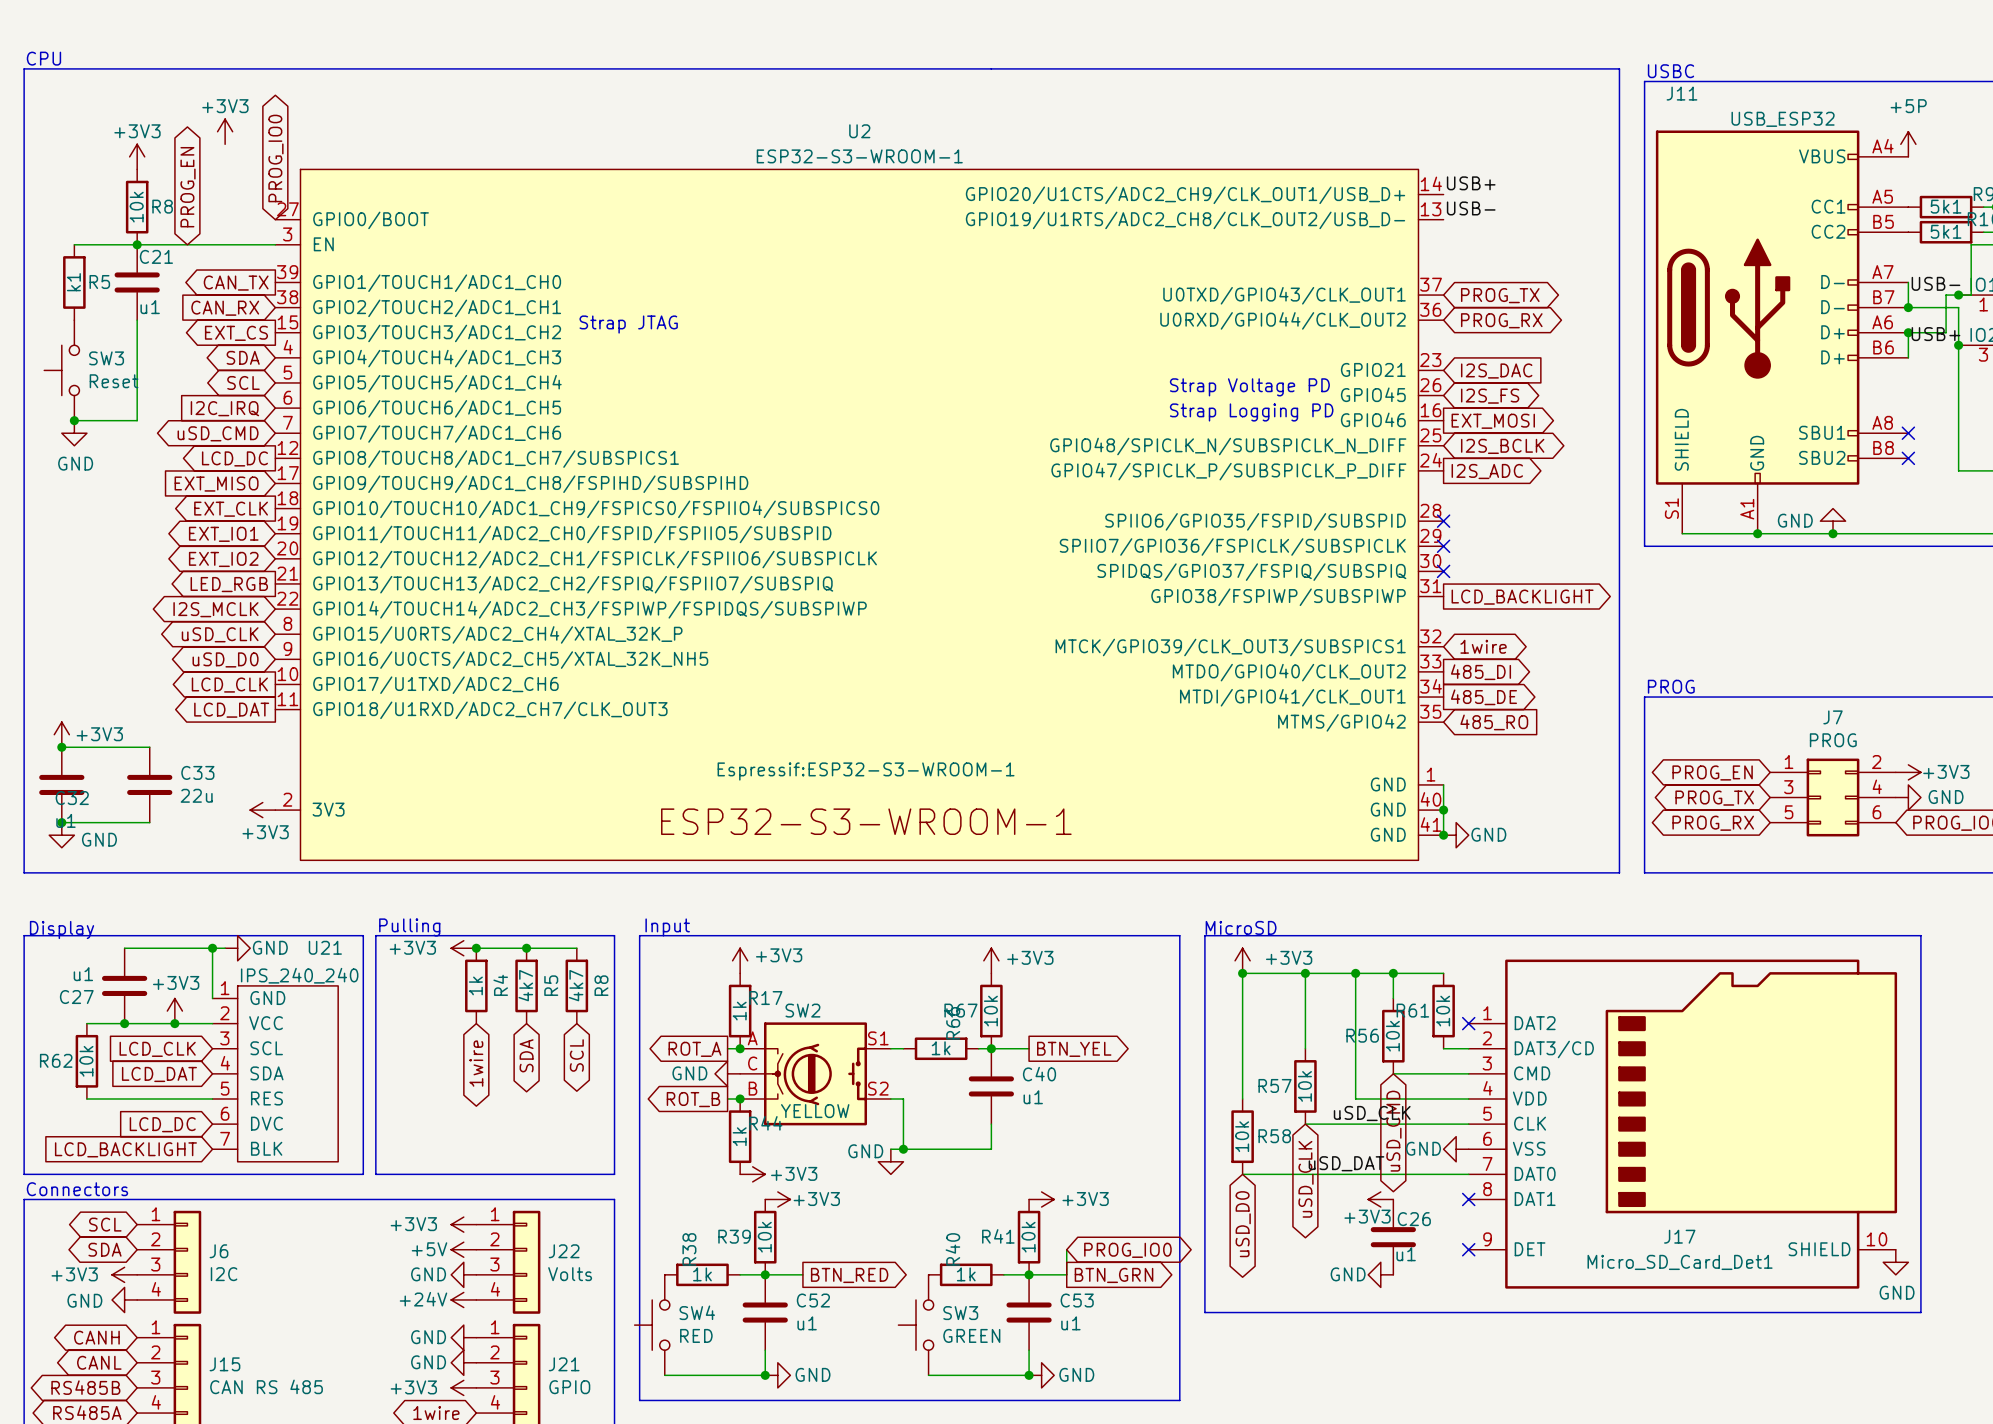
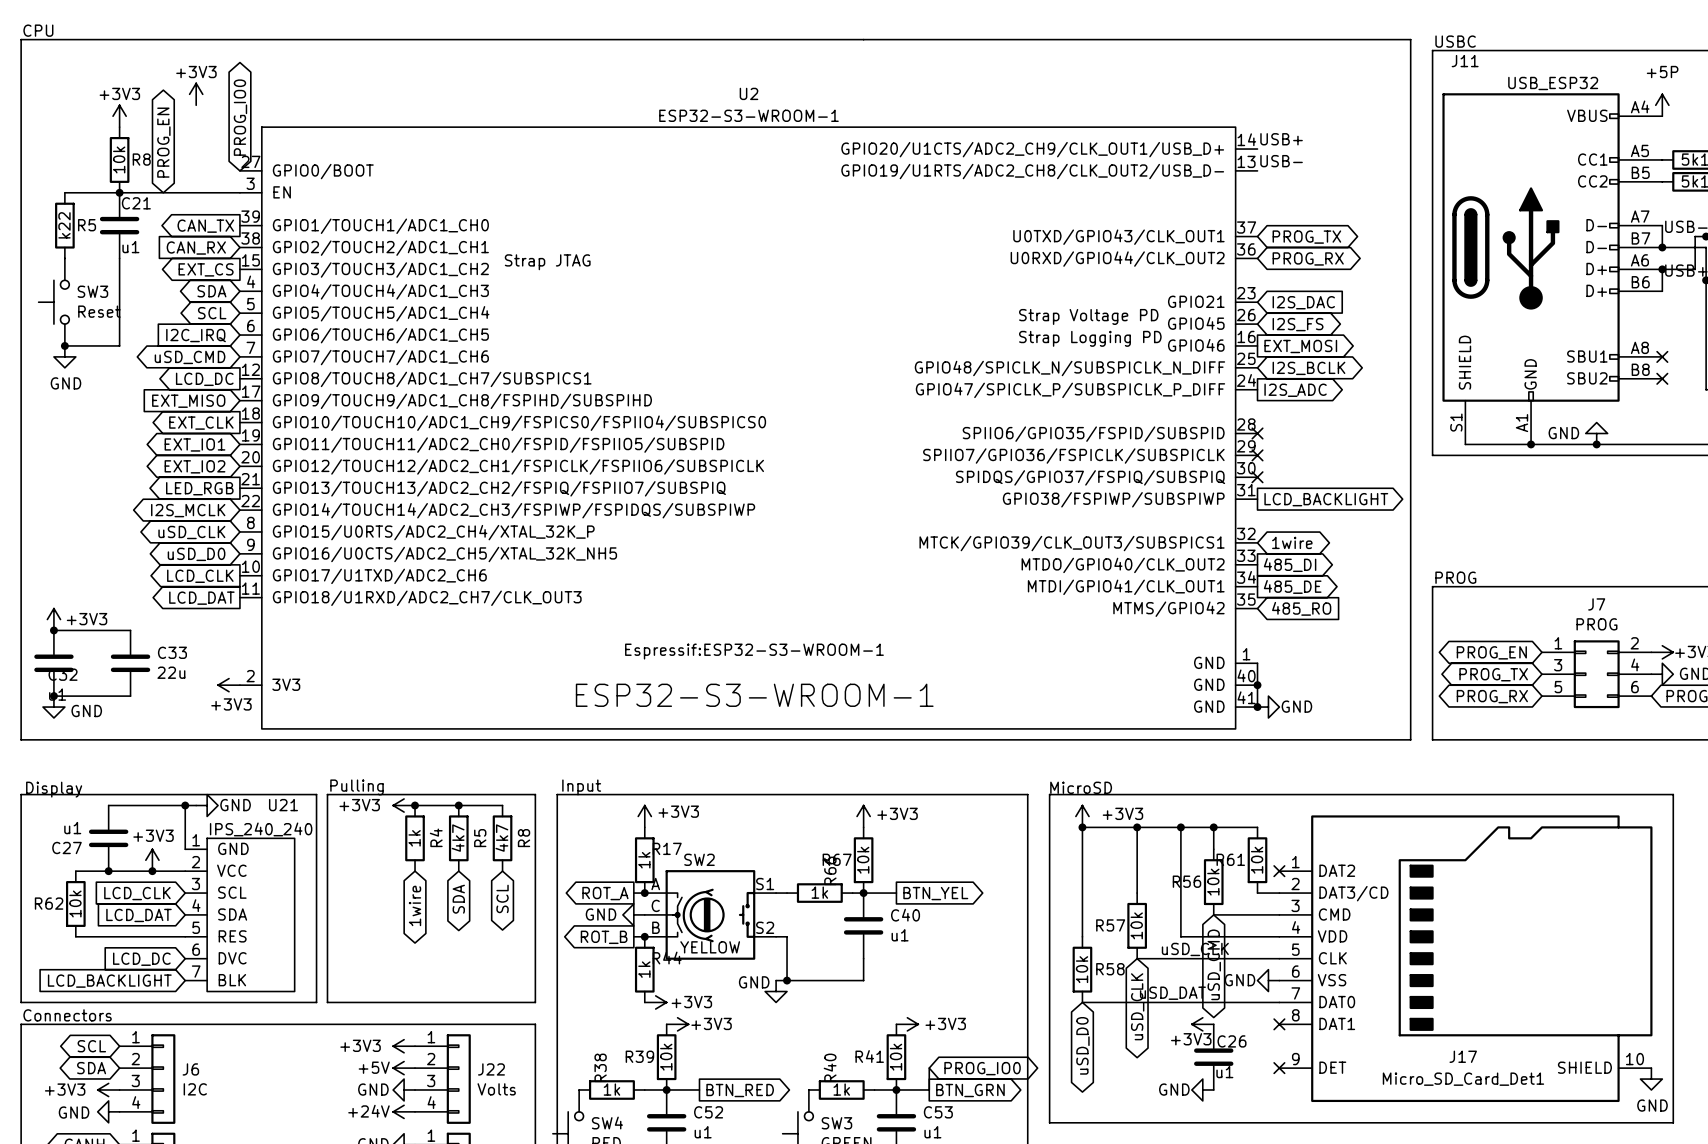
R5 value: k1 (73, 282) -> k22 (64, 225)

